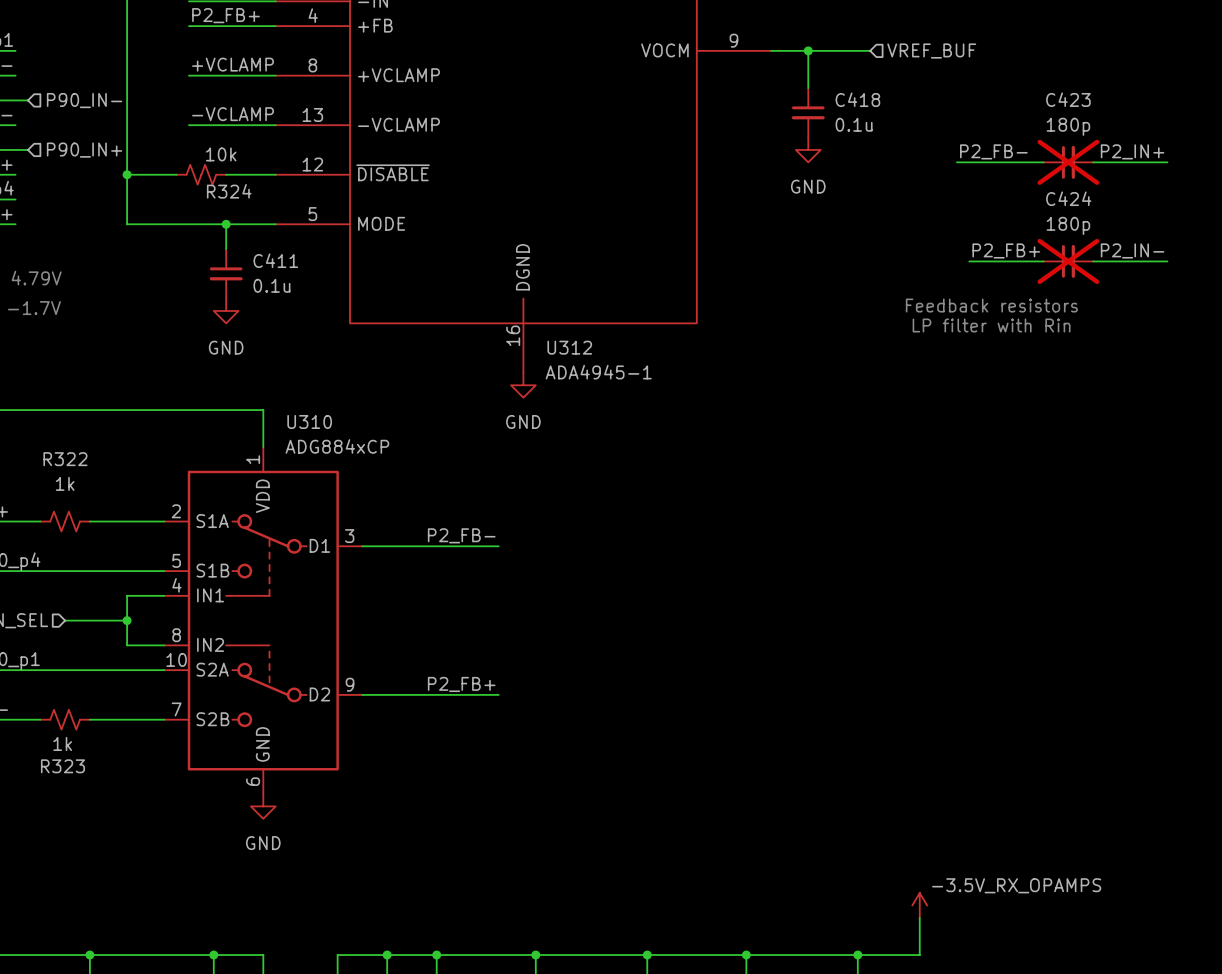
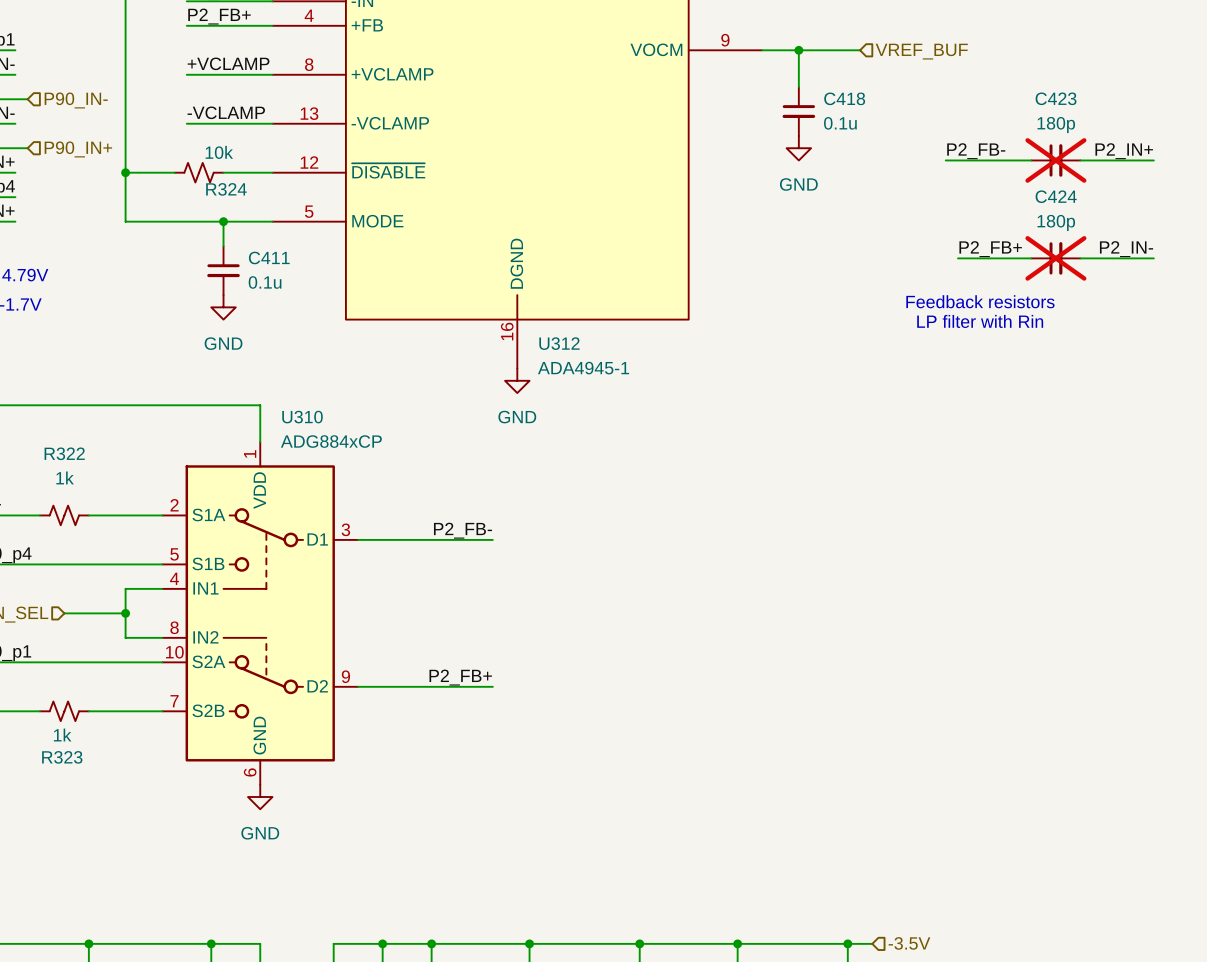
power symbol: -3.5V_RX_OPAMPS (919, 905) -> none
wire: (919, 917) (919, 955) (882, 955) -> none
hierarchical label: none -> -3.5V (909, 943)

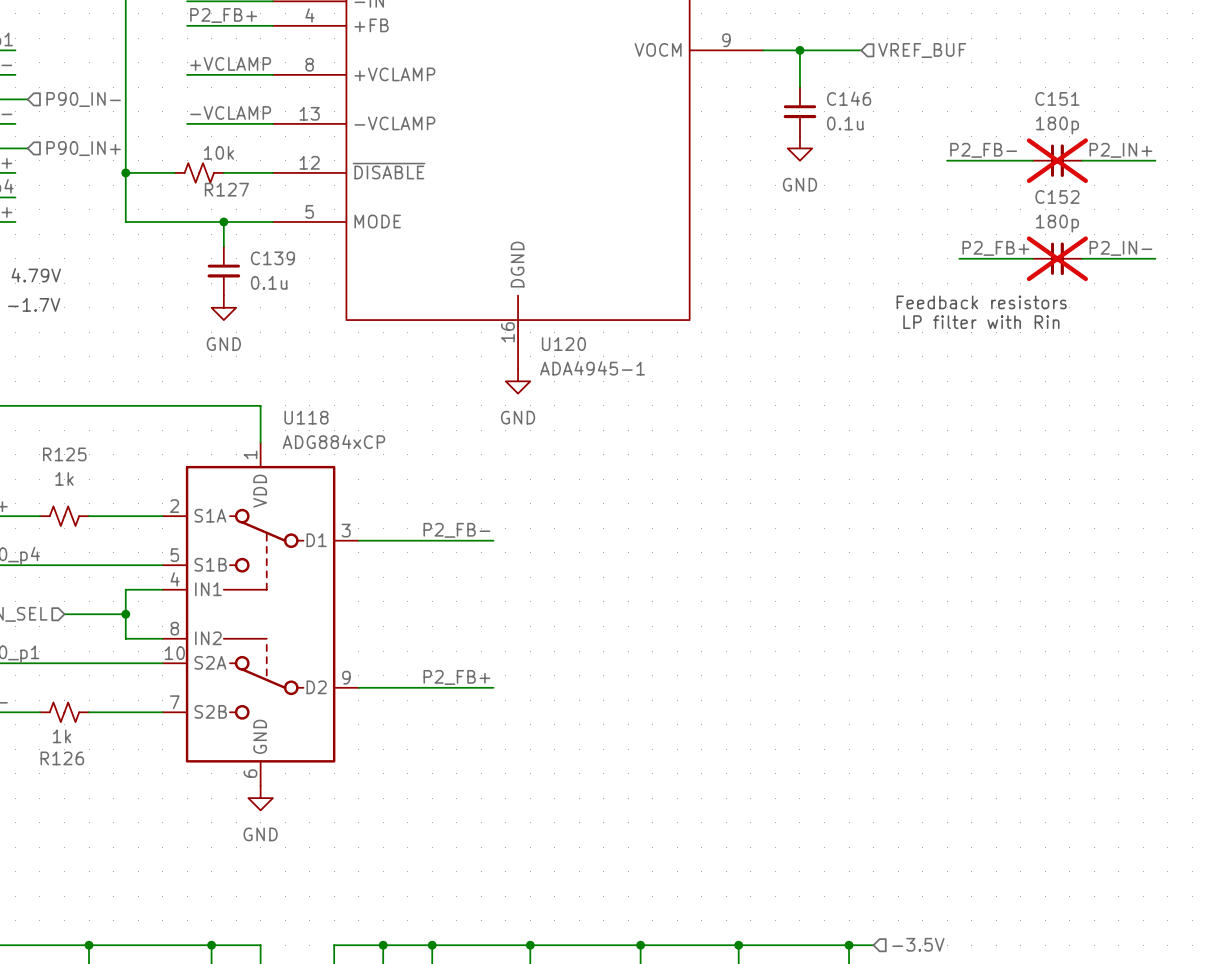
C418 name: C418 (844, 98) -> C146 (849, 98)
C423 name: C423 (1056, 98) -> C151 (1057, 98)
R324 name: R324 (226, 189) -> R127 (226, 189)
C424 name: C424 (1056, 196) -> C152 (1057, 197)
C411 name: C411 (269, 257) -> C139 (272, 258)
U312 name: U312 (559, 343) -> U120 (563, 344)
U310 name: U310 (302, 417) -> U118 (306, 417)
R322 name: R322 (64, 453) -> R125 (64, 454)
R323 name: R323 (62, 757) -> R126 (62, 758)

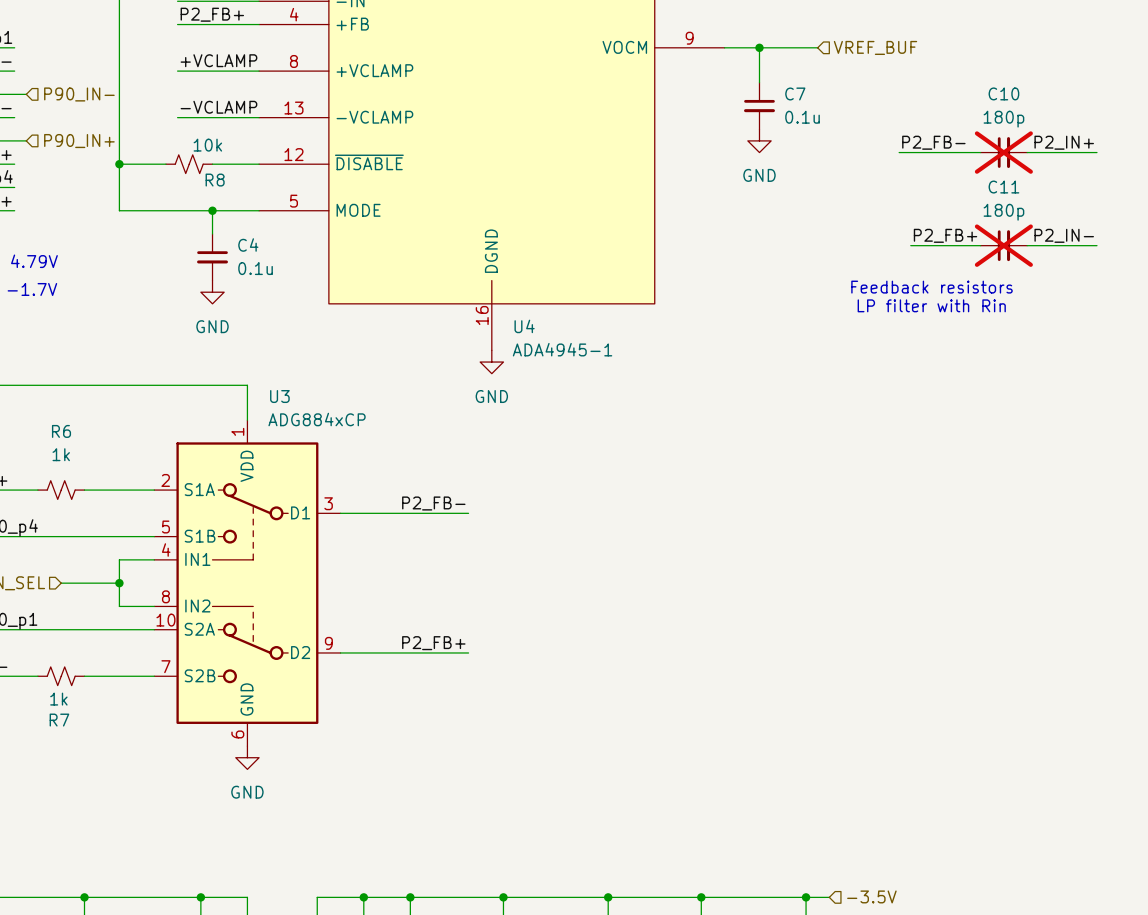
C146 name: C146 (849, 98) -> C7 (795, 93)
C151 name: C151 (1057, 98) -> C10 (1003, 93)
R127 name: R127 (226, 189) -> R8 (215, 180)
C152 name: C152 (1057, 197) -> C11 (1003, 187)
C139 name: C139 (272, 258) -> C4 (248, 245)
U120 name: U120 (563, 344) -> U4 (524, 326)
U118 name: U118 (306, 417) -> U3 (279, 396)
R125 name: R125 (64, 454) -> R6 (61, 431)
R126 name: R126 (62, 758) -> R7 (59, 720)

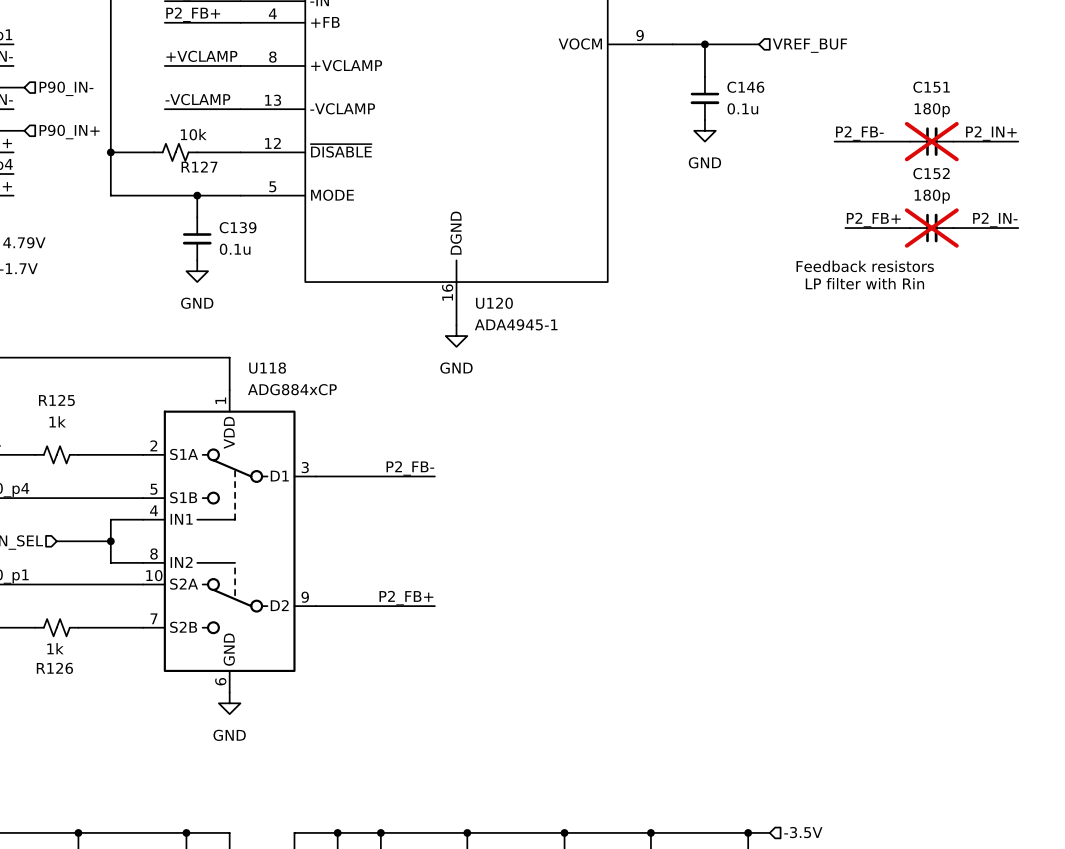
C7 name: C7 (795, 93) -> C146 (745, 87)
C10 name: C10 (1003, 93) -> C151 (931, 87)
R8 name: R8 (215, 180) -> R127 (199, 167)
C11 name: C11 (1003, 187) -> C152 (931, 173)
C4 name: C4 (248, 245) -> C139 (238, 227)
U4 name: U4 (524, 326) -> U120 (494, 303)
U3 name: U3 (279, 396) -> U118 (267, 368)
R6 name: R6 (61, 431) -> R125 (56, 400)
R7 name: R7 (59, 720) -> R126 (54, 668)

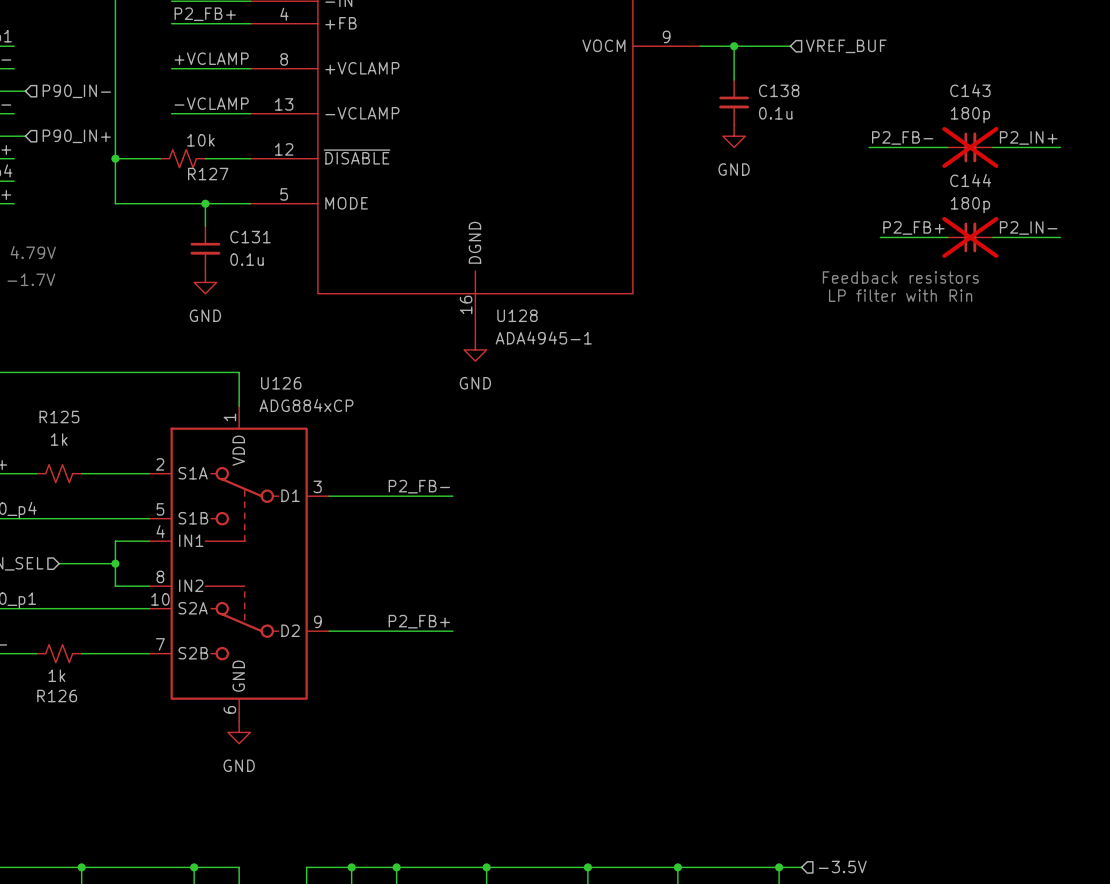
C146 name: C146 (745, 87) -> C138 (779, 90)
C151 name: C151 (931, 87) -> C143 (970, 90)
C152 name: C152 (931, 173) -> C144 (970, 180)
C139 name: C139 (238, 227) -> C131 (250, 237)
U120 name: U120 (494, 303) -> U128 (517, 315)
U118 name: U118 (267, 368) -> U126 (281, 383)

